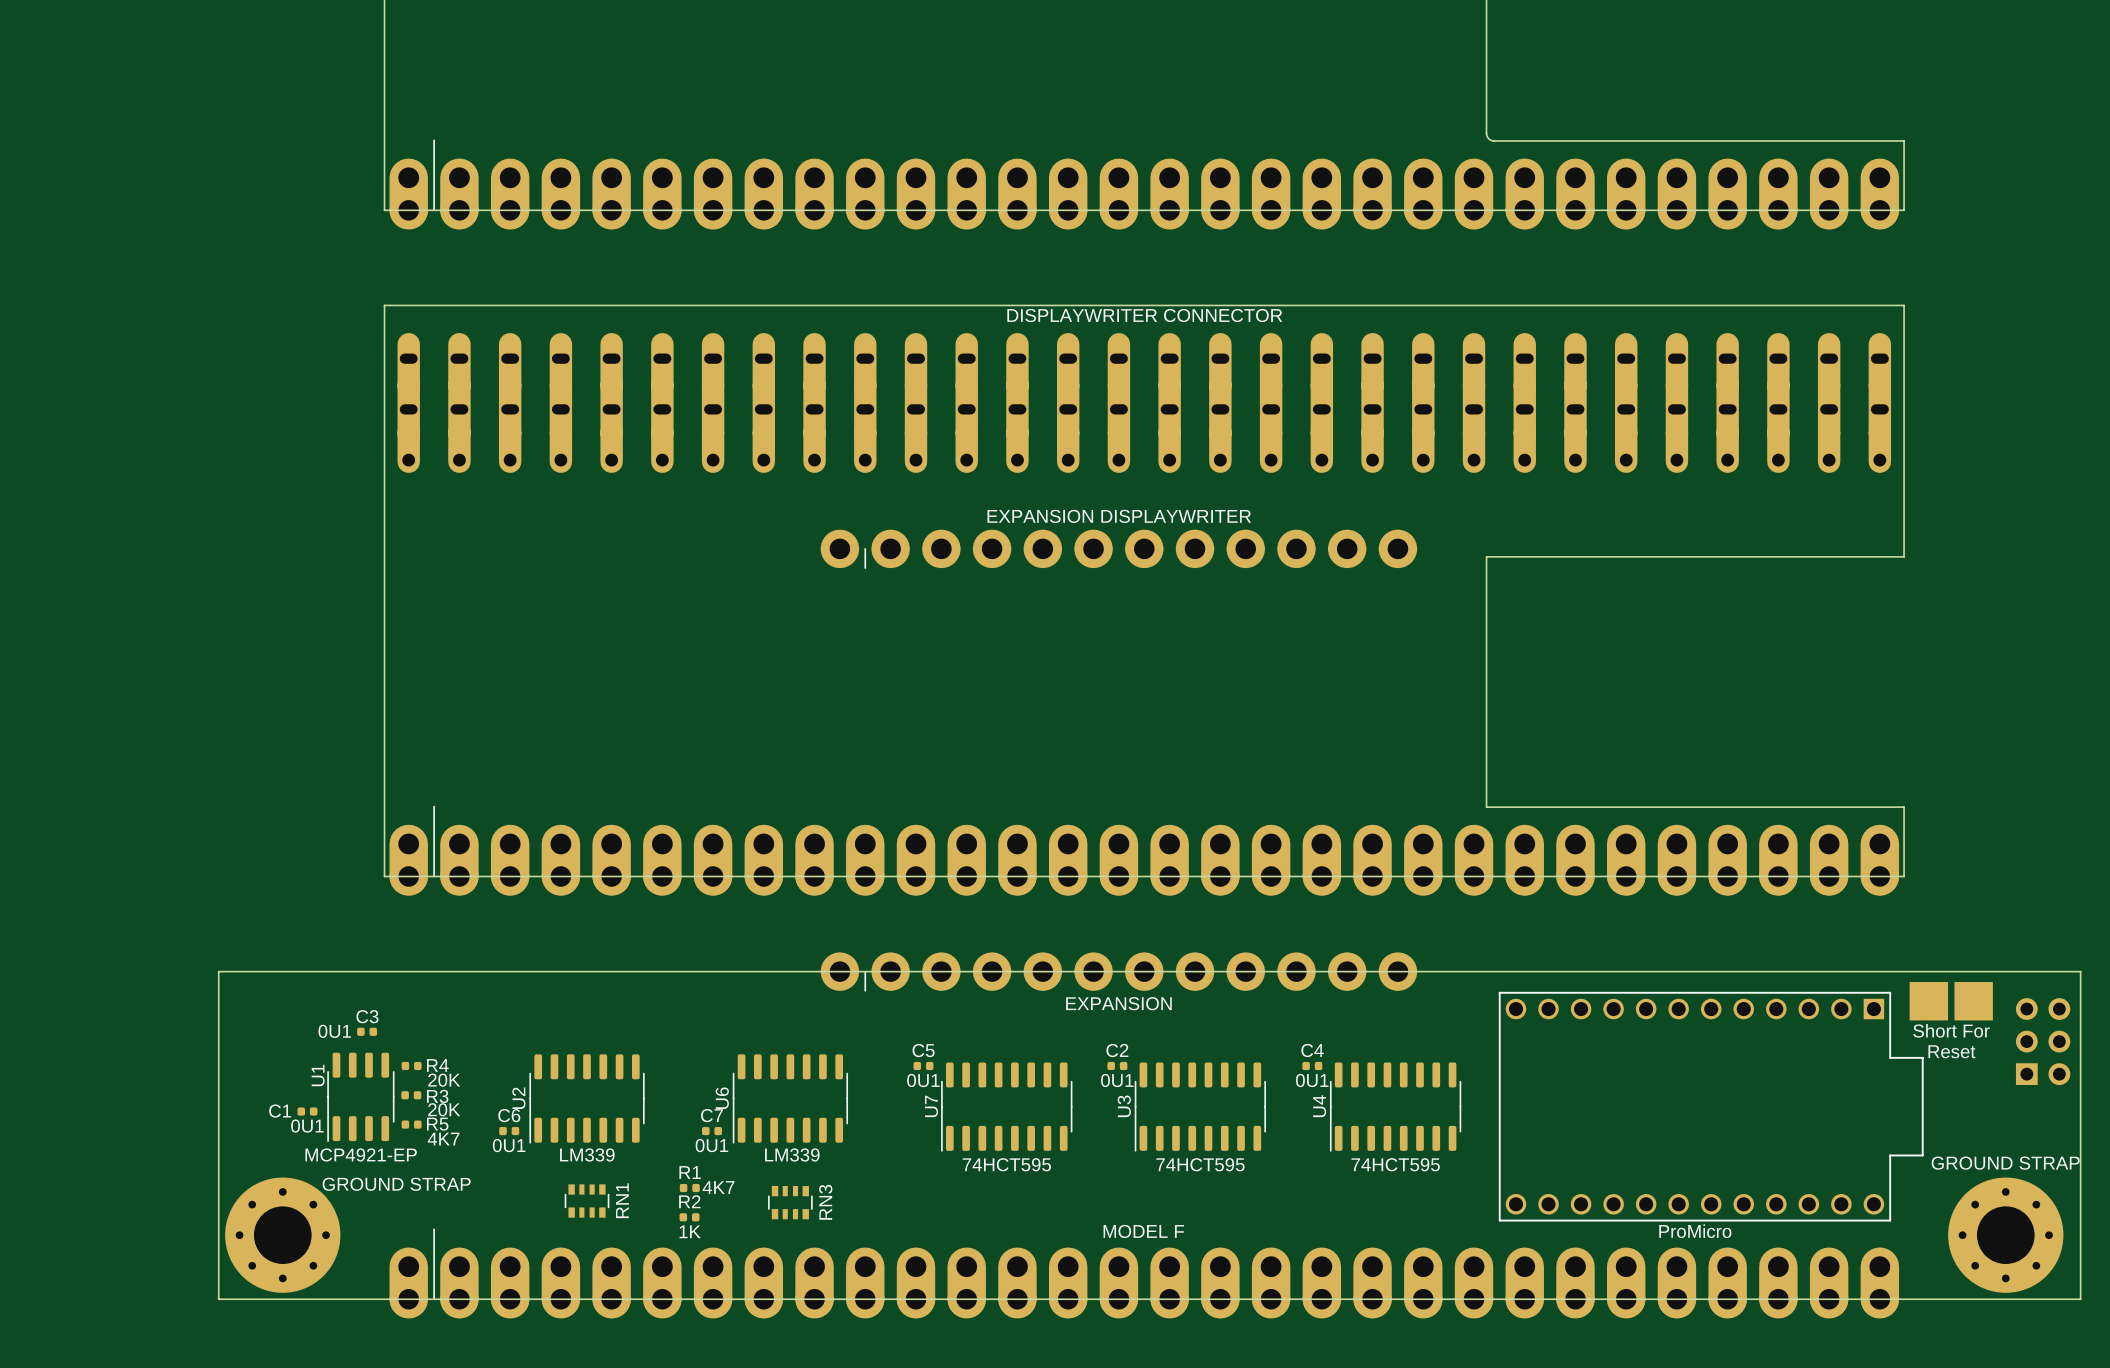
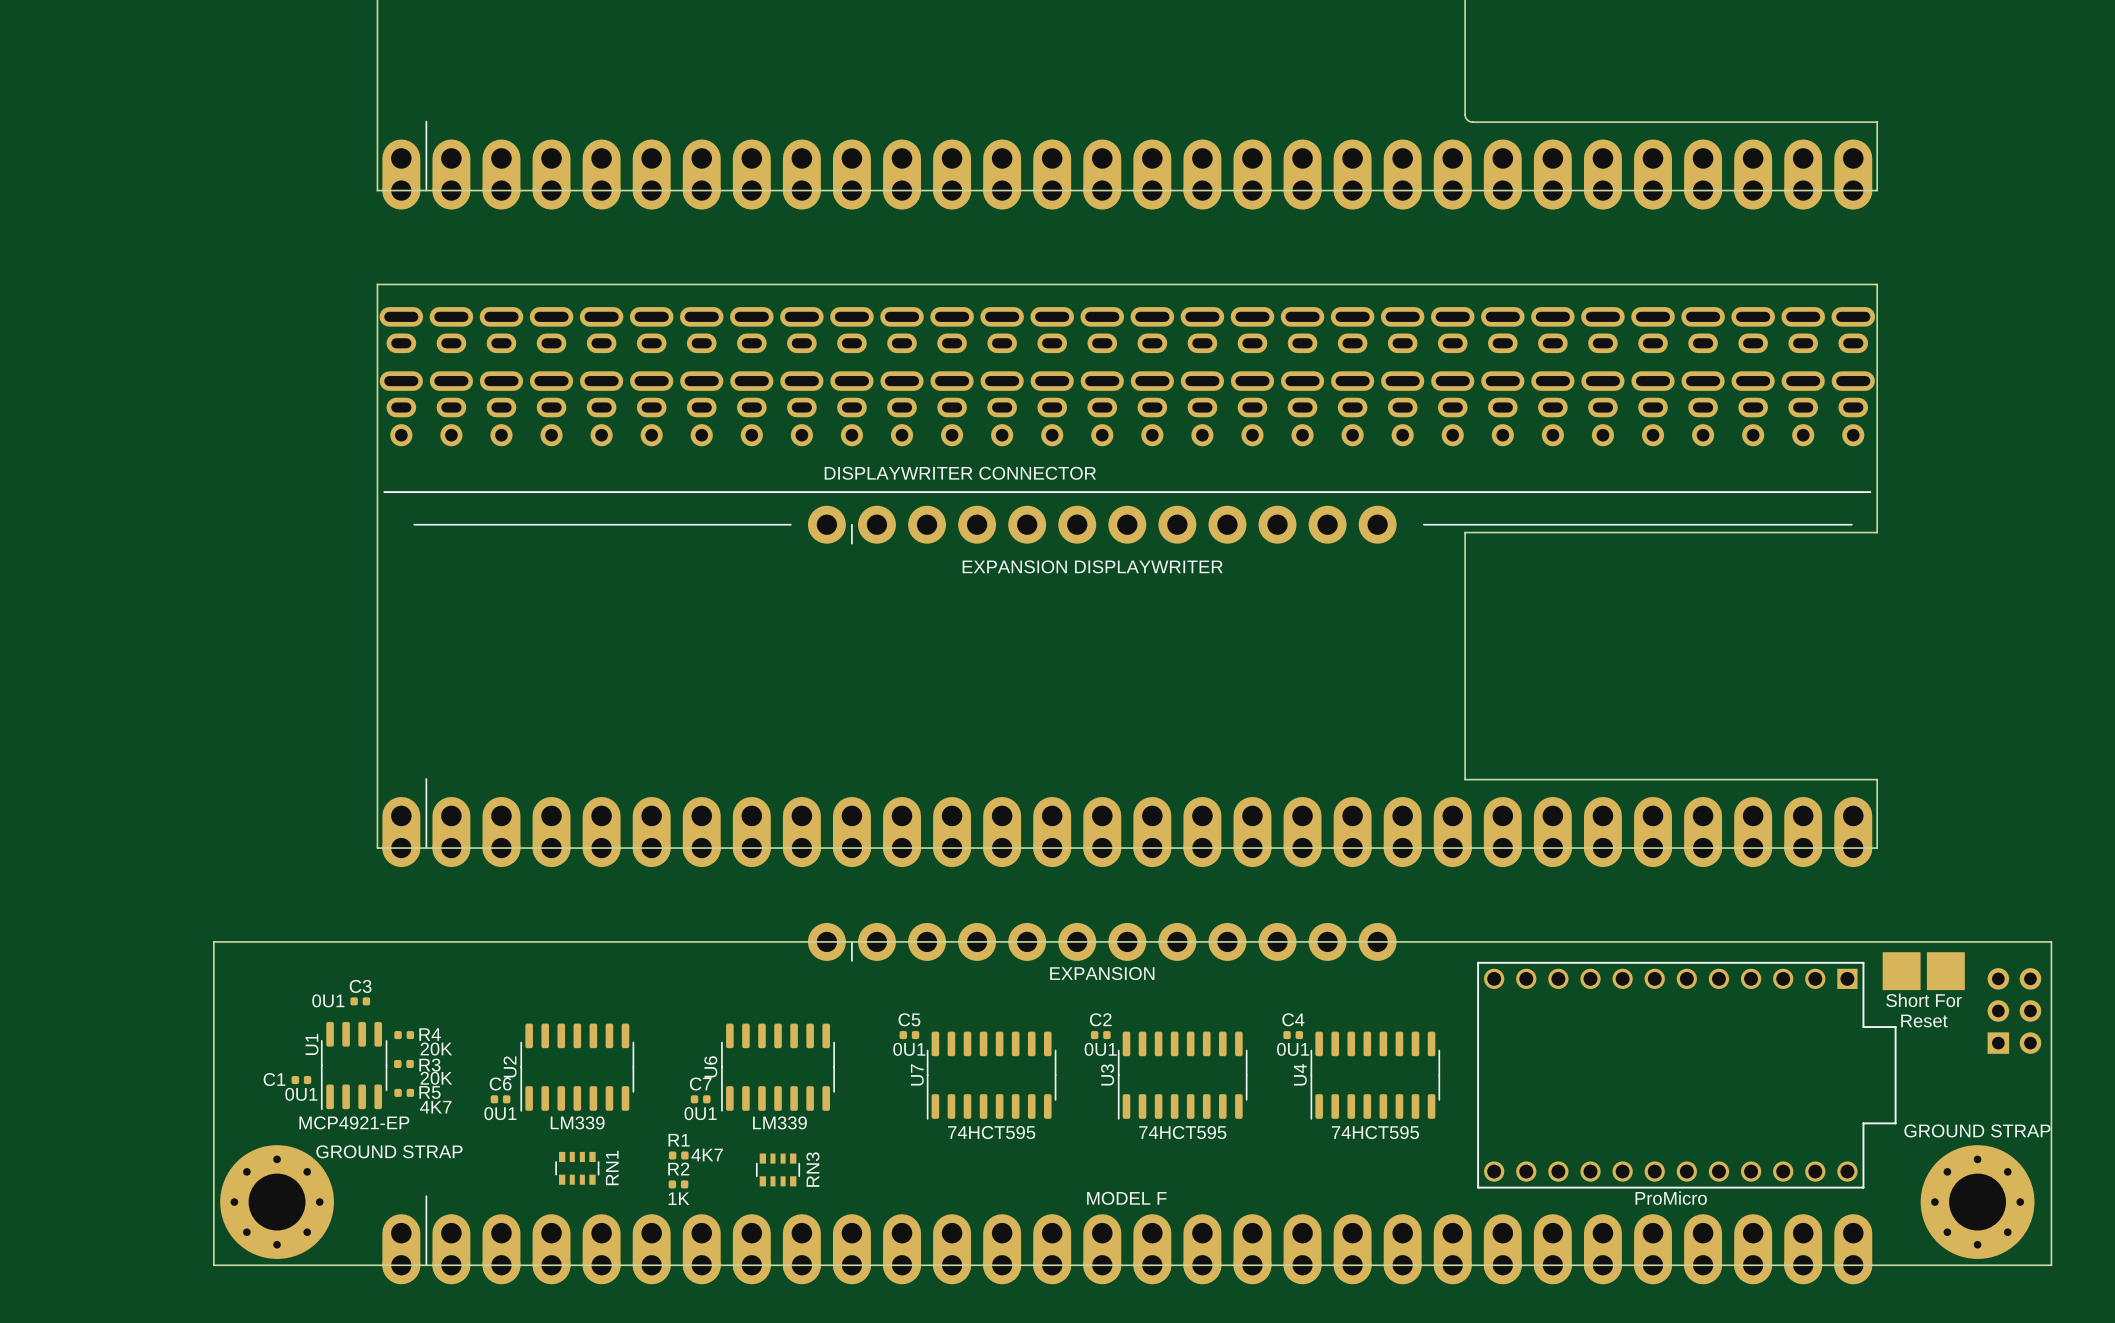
part: DISPLAYWRITER CONNECTOR (1144, 402) -> none
part: none -> DISPLAYWRITER CONNECTOR (1127, 400)
part value position: EXPANSION DISPLAYWRITER (1119, 516) -> EXPANSION DISPLAYWRITER (1092, 566)
line: none -> (414, 524) (790, 524)
line: none -> (1423, 524) (1851, 524)

